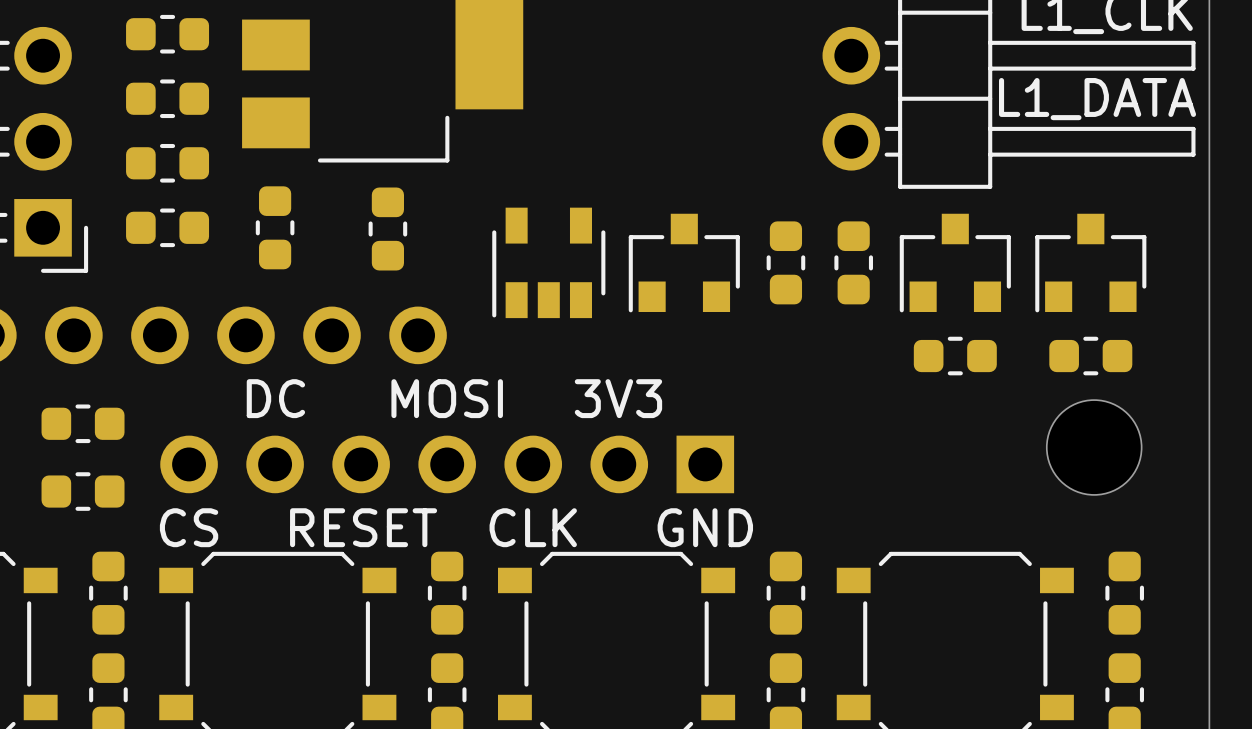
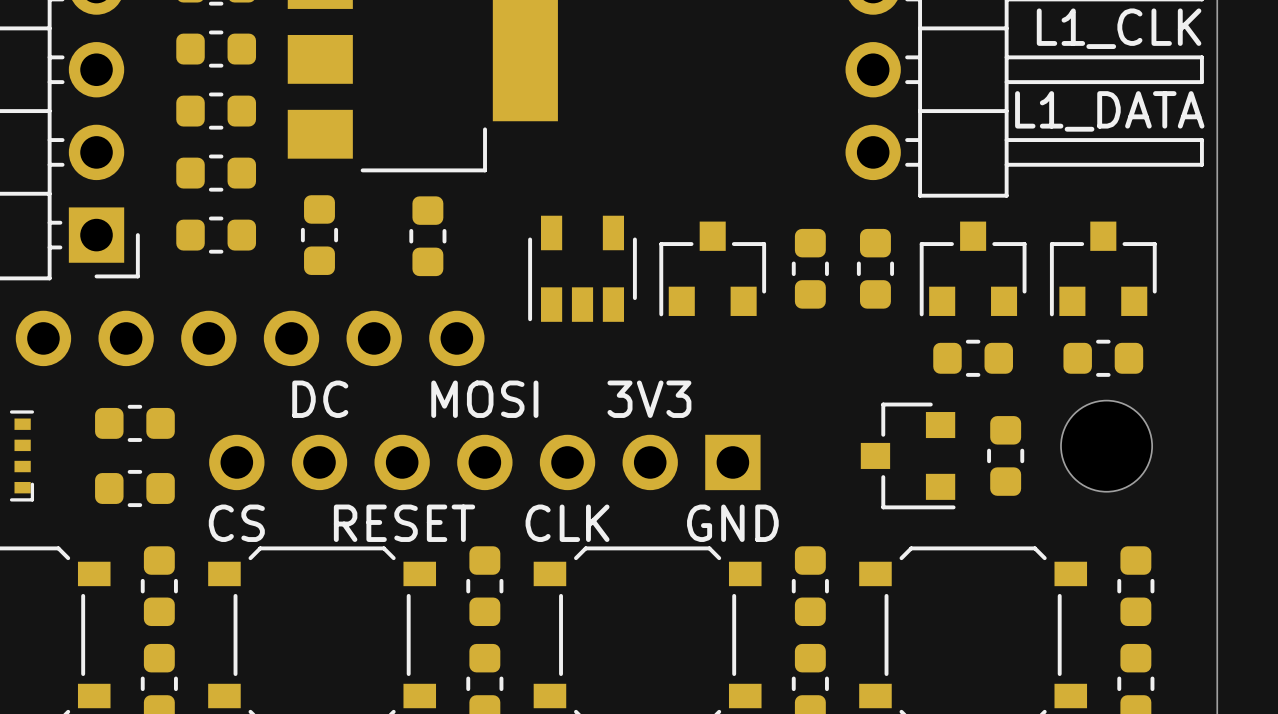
part: none -> (908, 455)
part: none -> (1005, 455)

